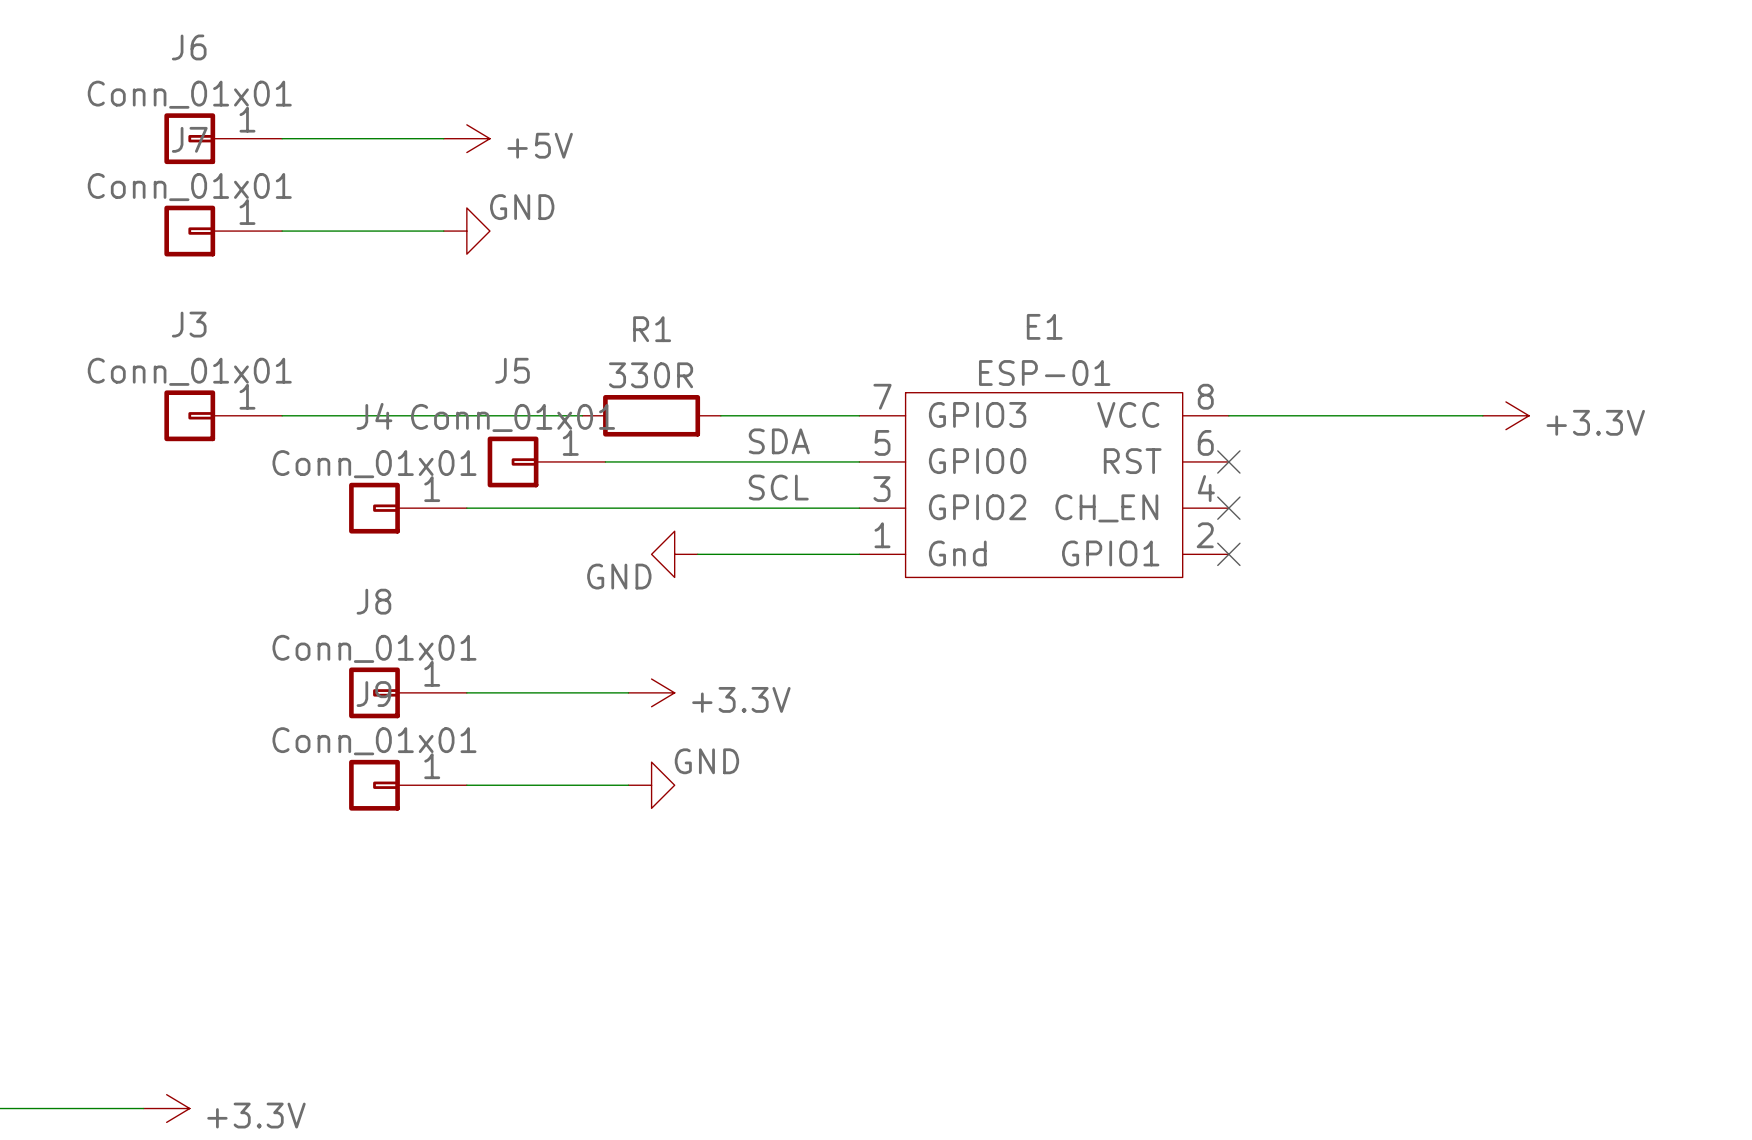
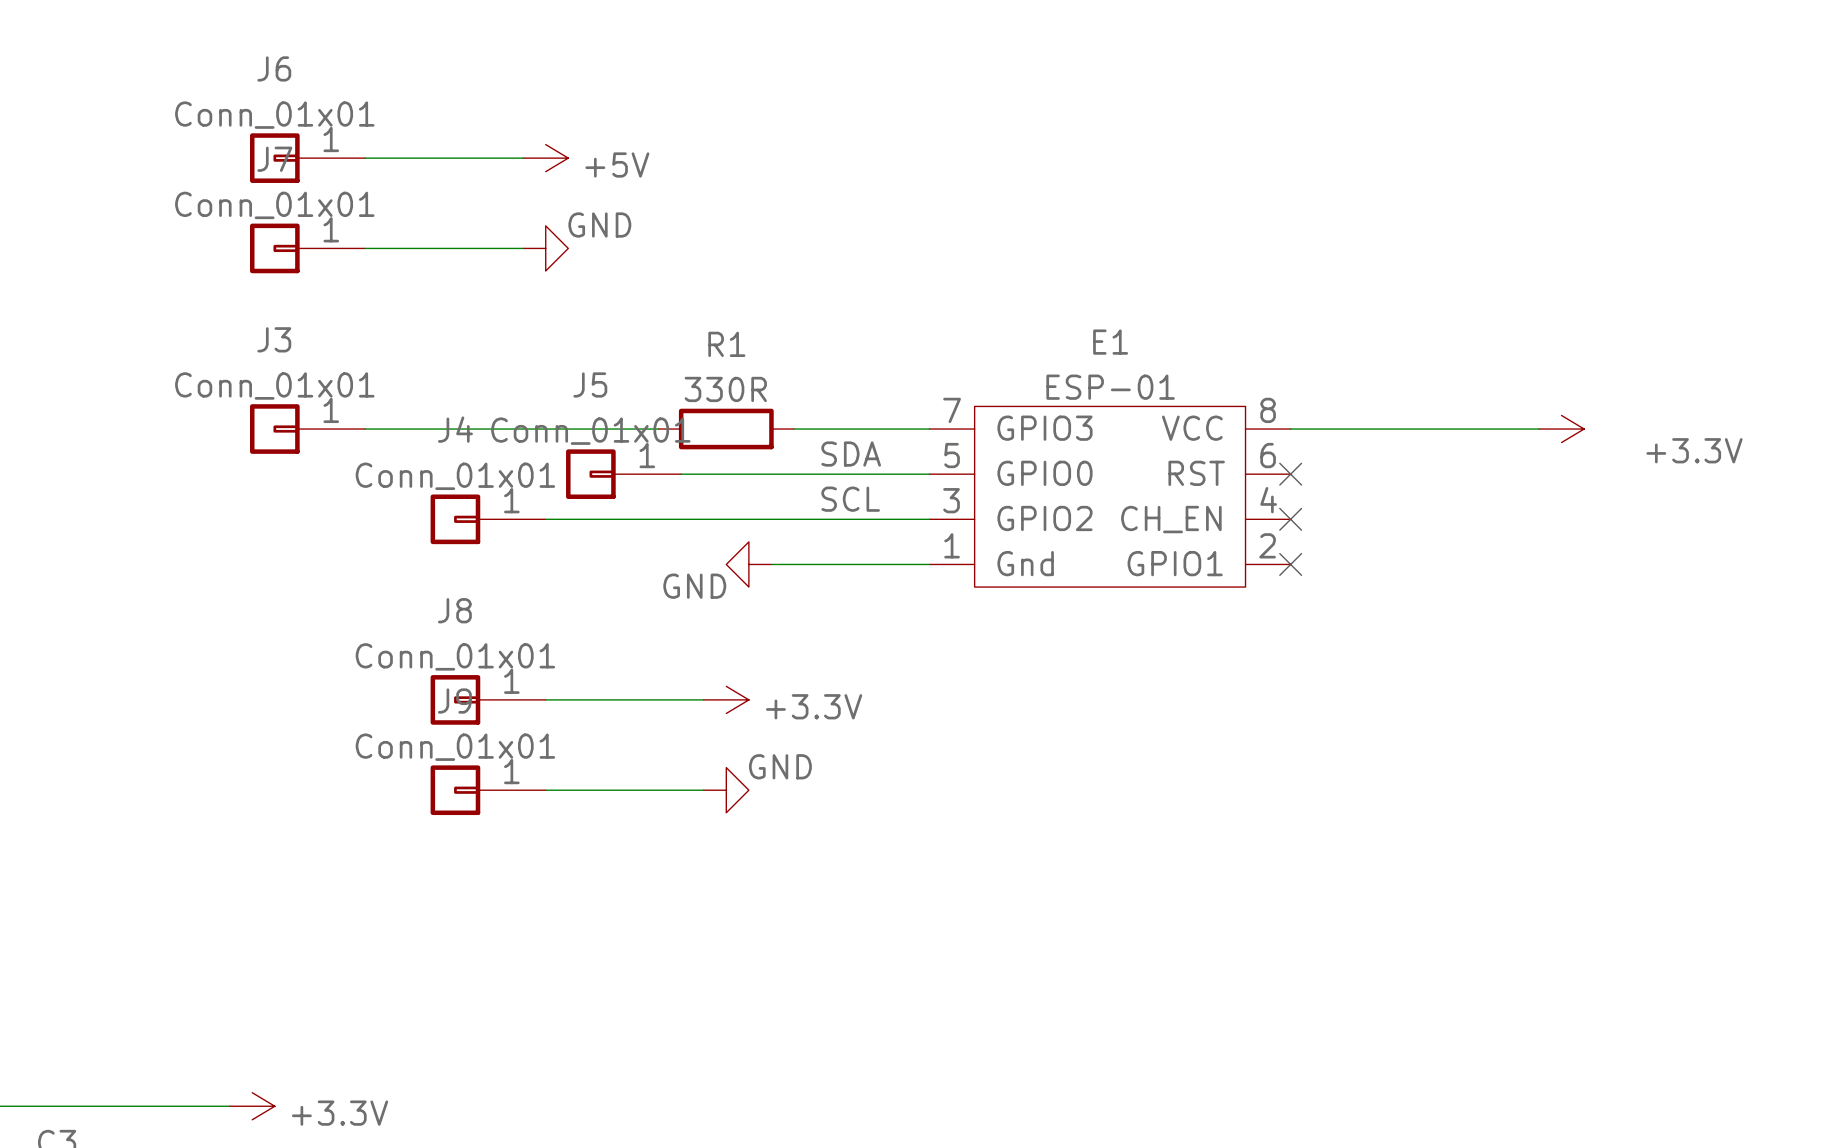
power symbol text position: +3.3V (1595, 422) -> +3.3V (1694, 450)

